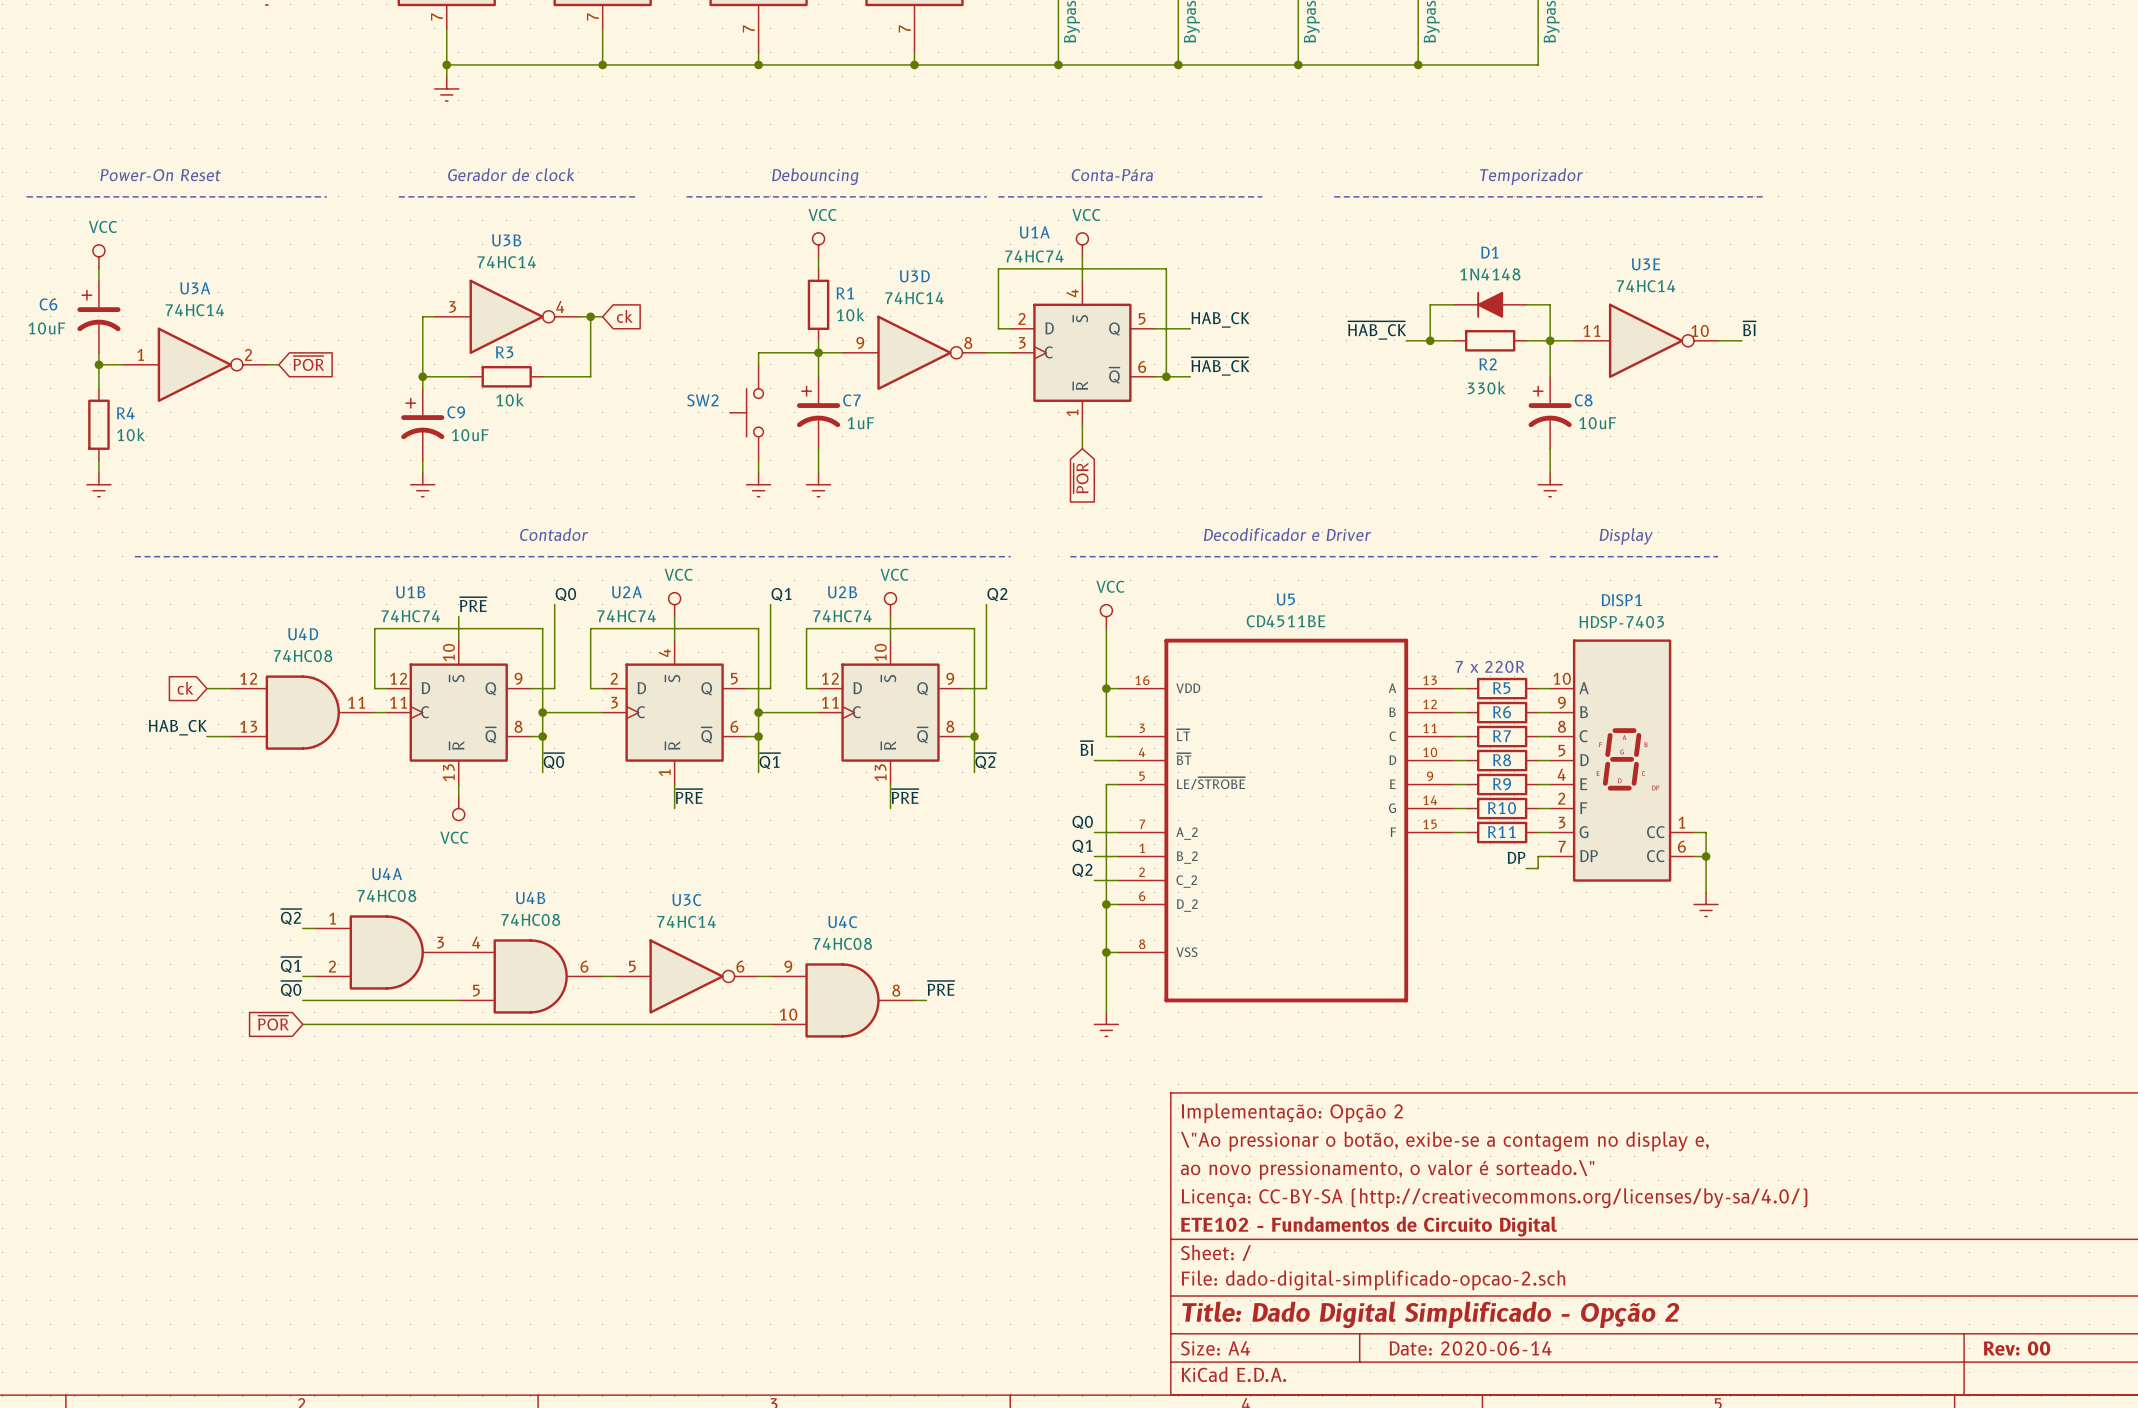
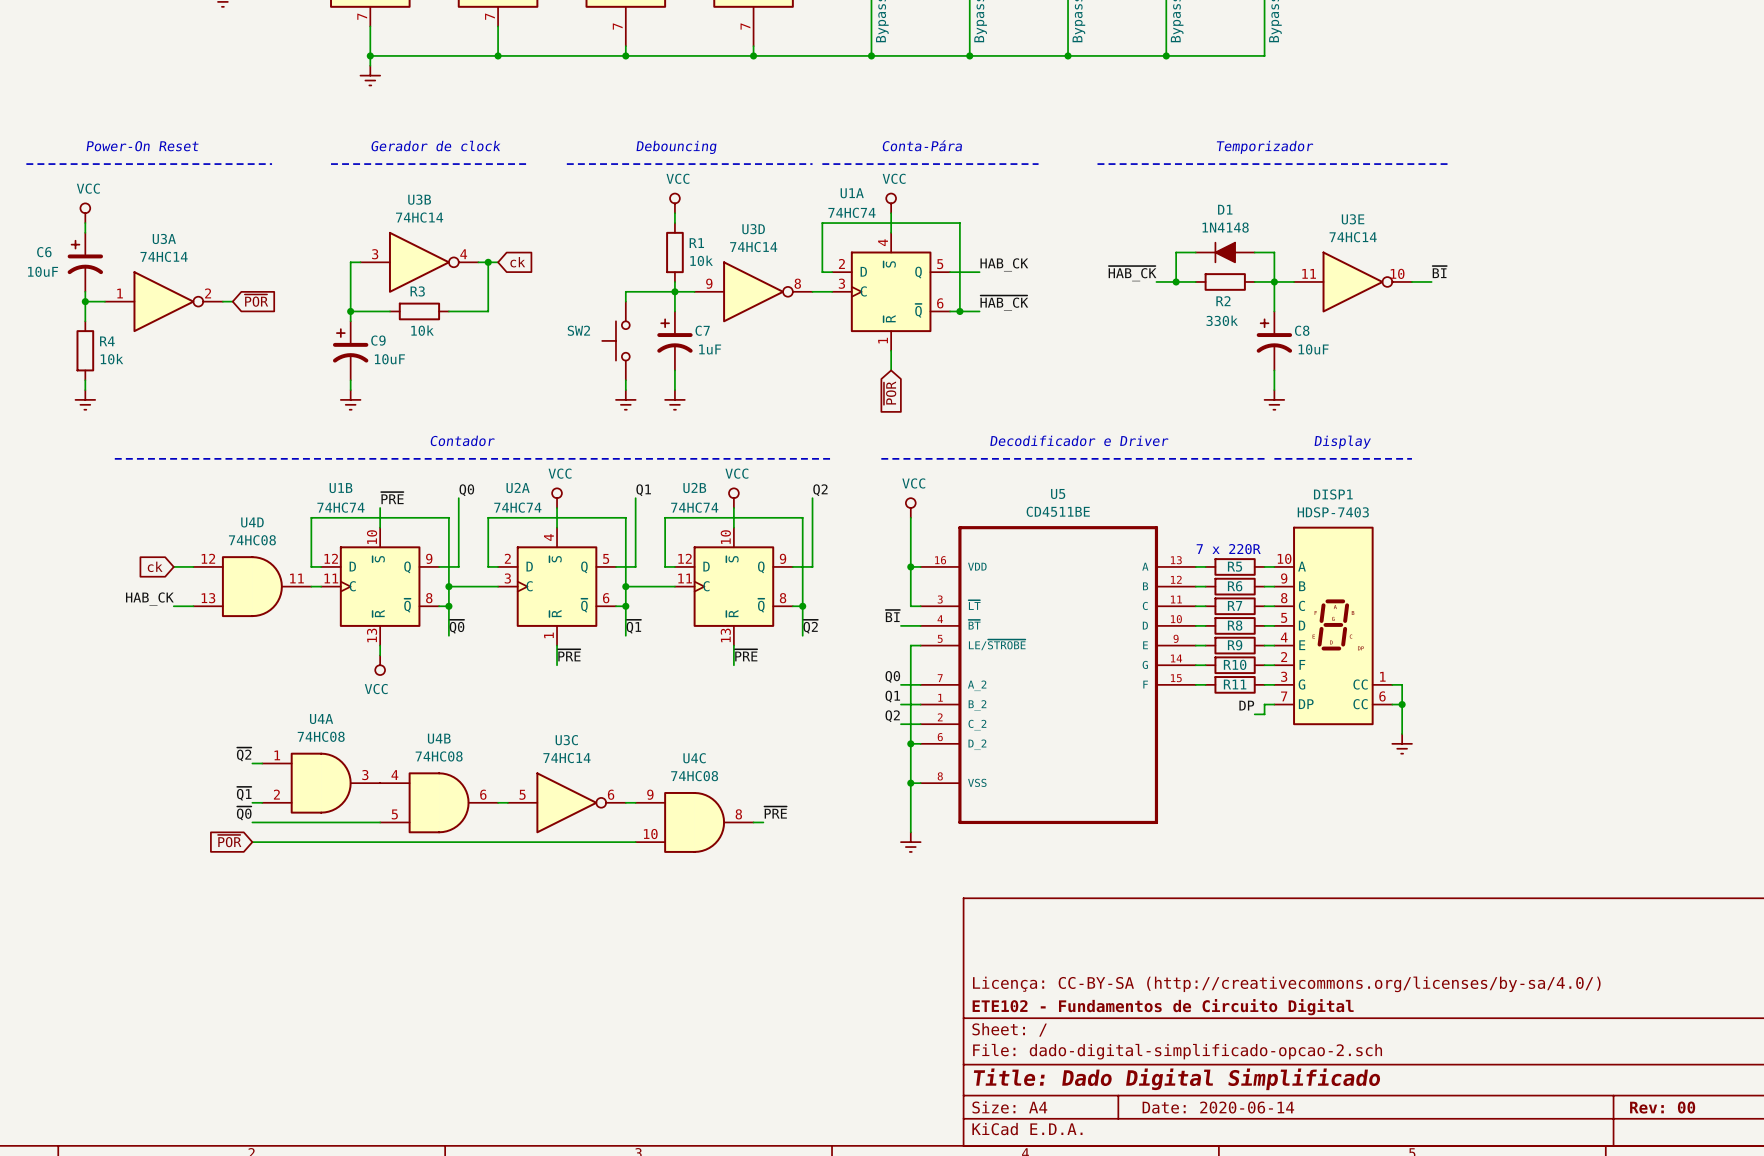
title block: Implementação: Opção 2 (1292, 1113) -> none
title block: \"Ao pressionar o botão, exibe-se a contagem no display e, (1444, 1141) -> none
title block: ao novo pressionamento, o valor é sorteado.\" (1387, 1169) -> none
title block: Title: Dado Digital Simplificado - Opção 2 (1430, 1314) -> Title: Dado Digital Simplificado (1177, 1079)

